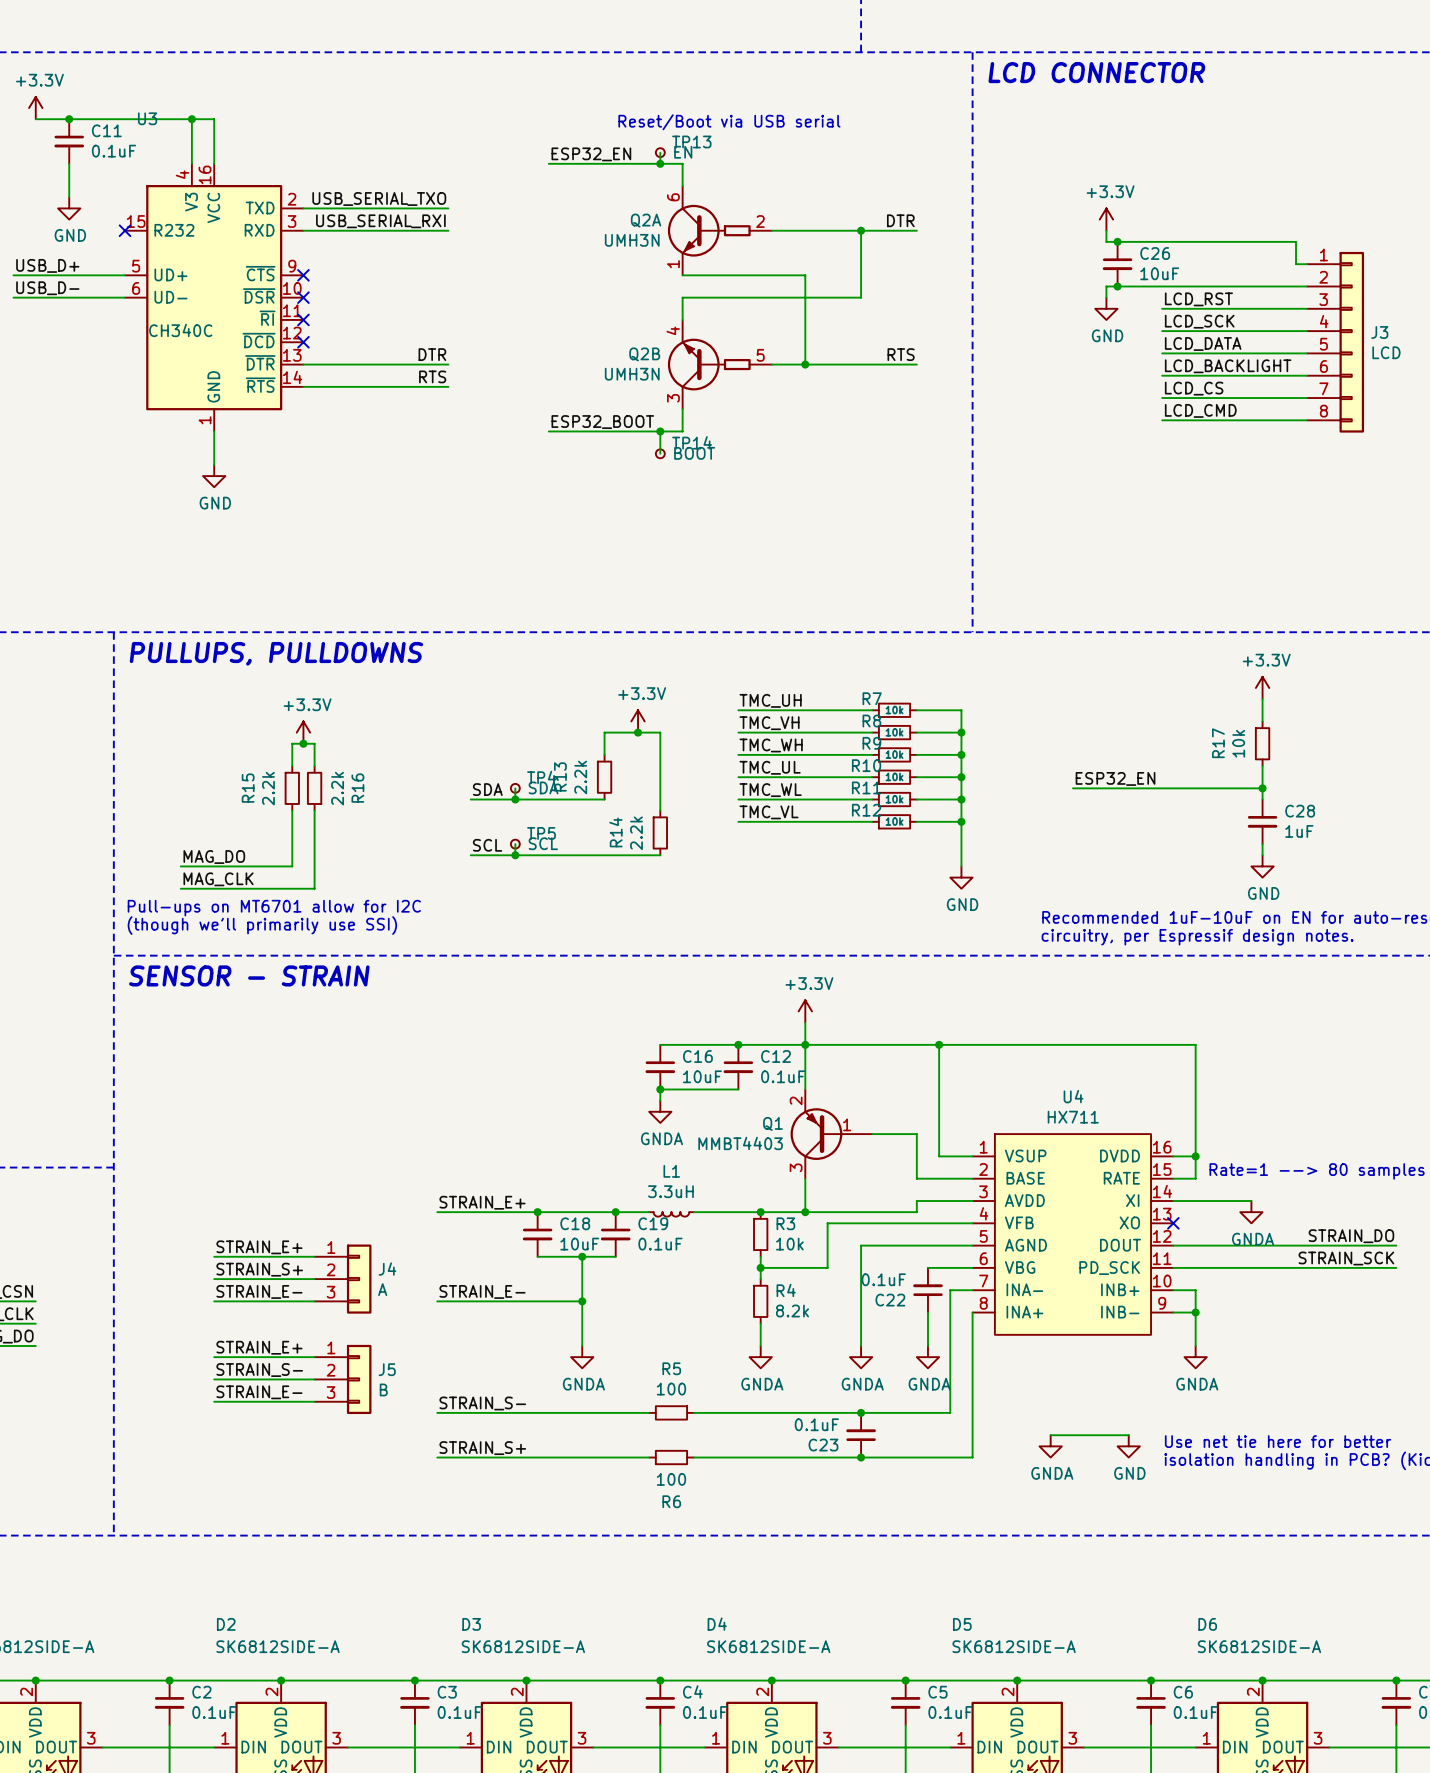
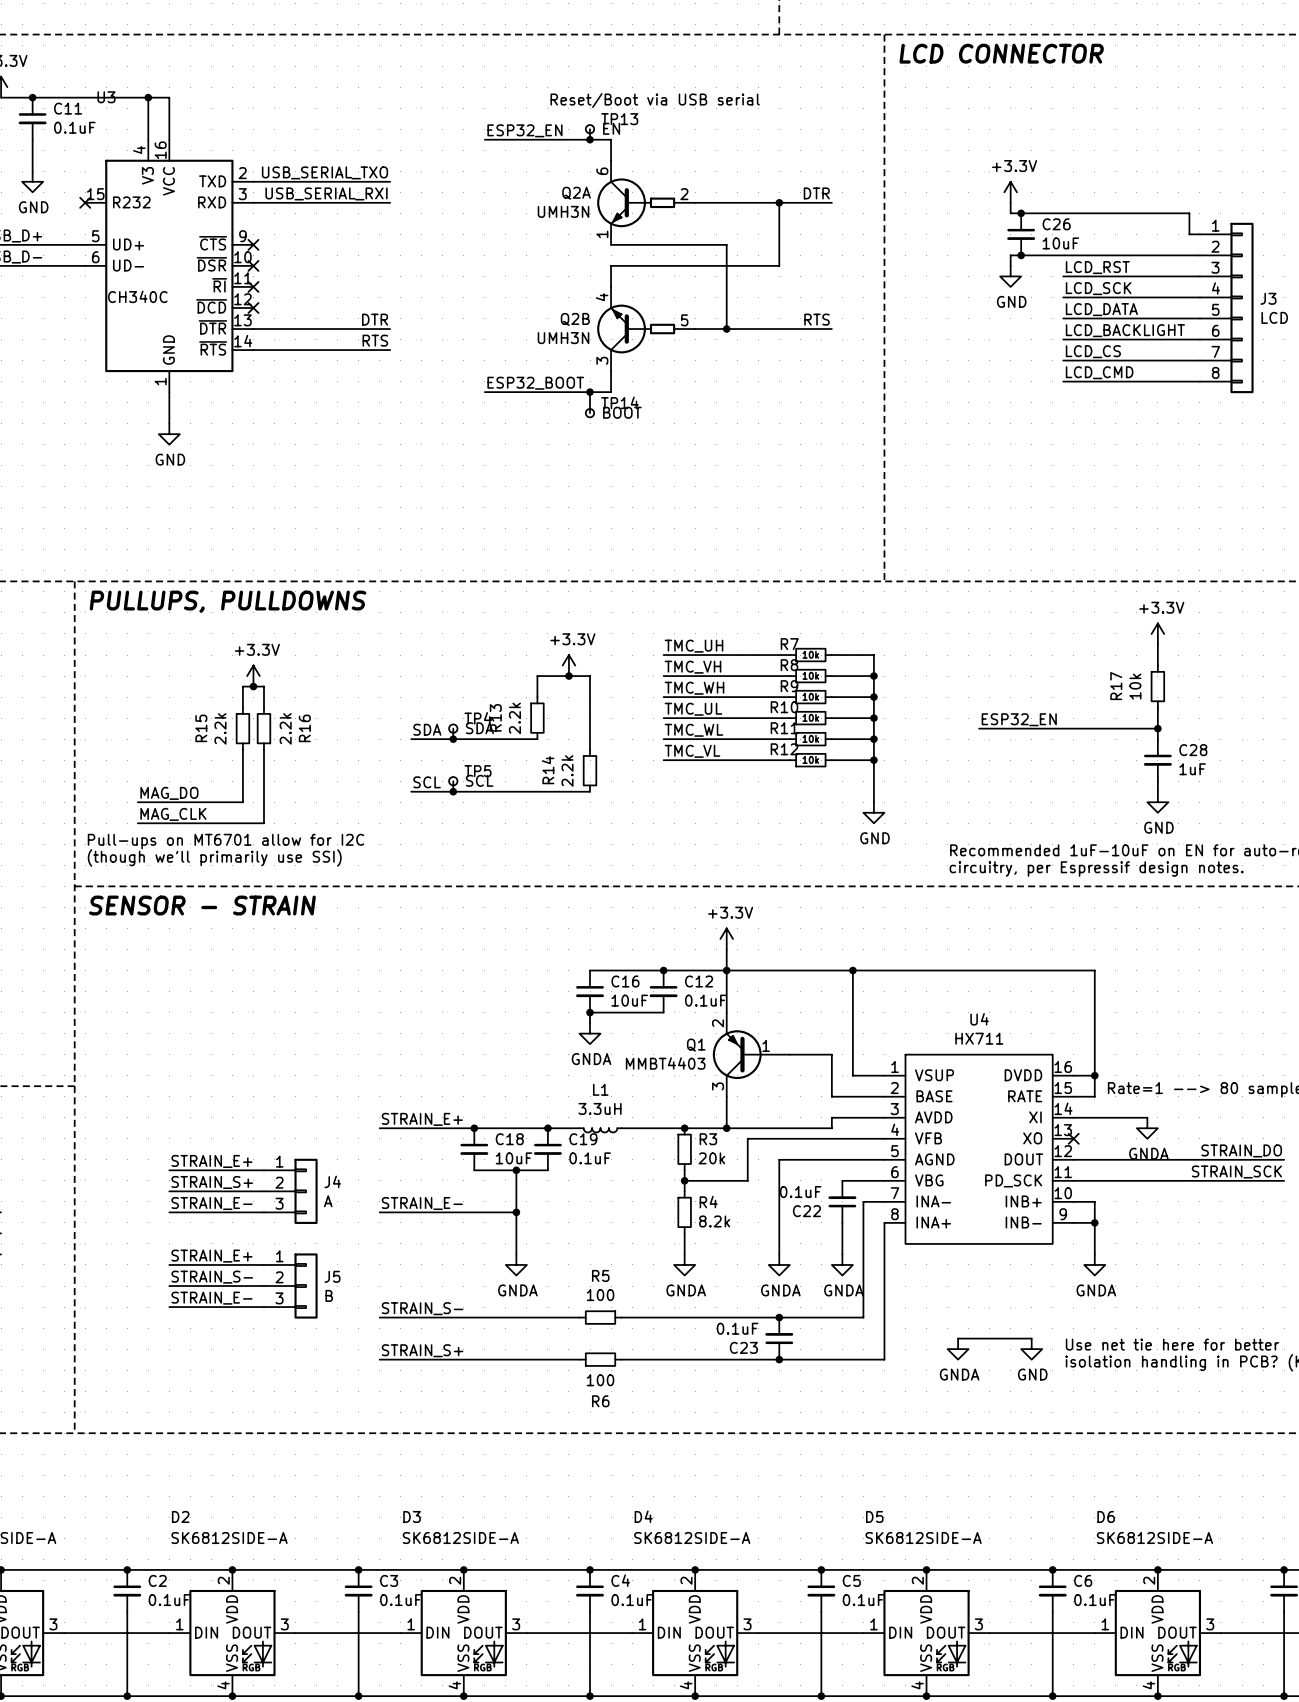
R3 value: 10k (789, 1244) -> 20k (711, 1158)

